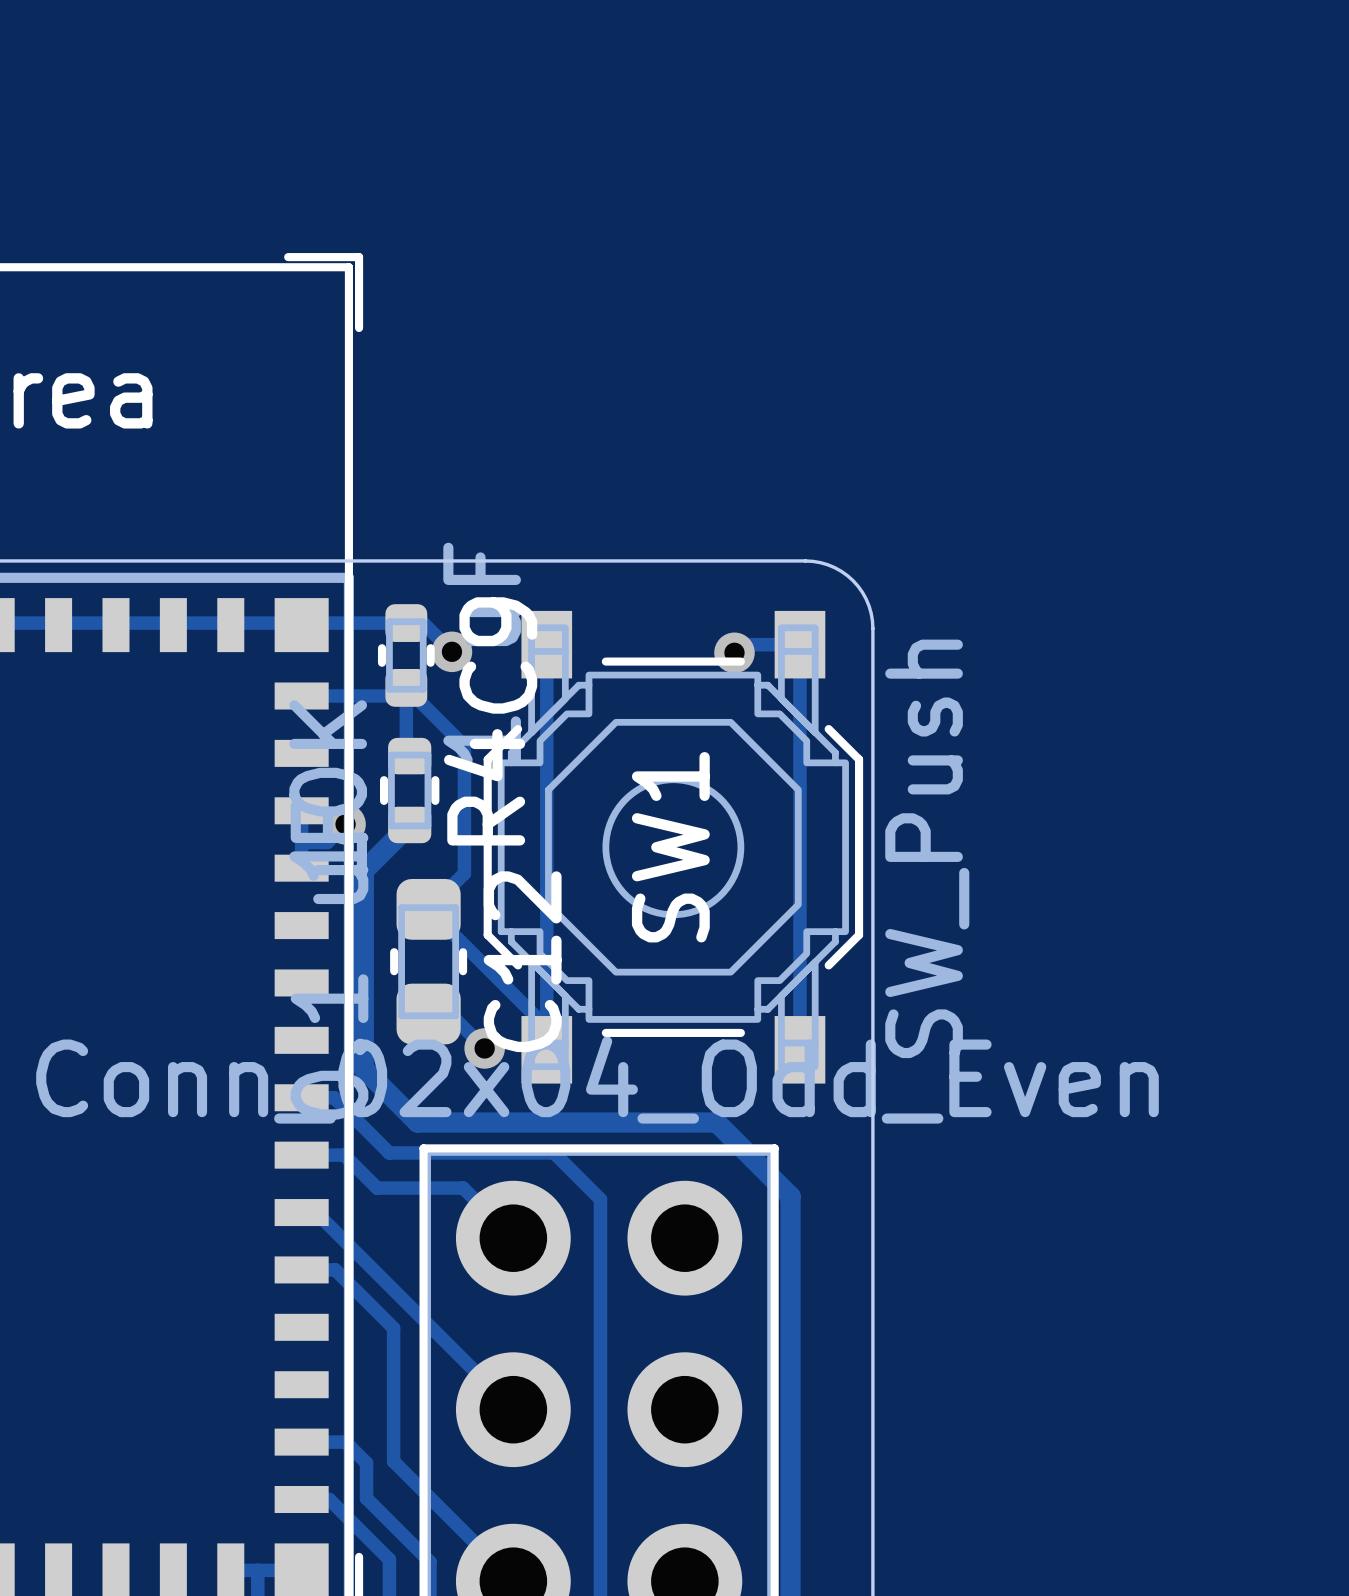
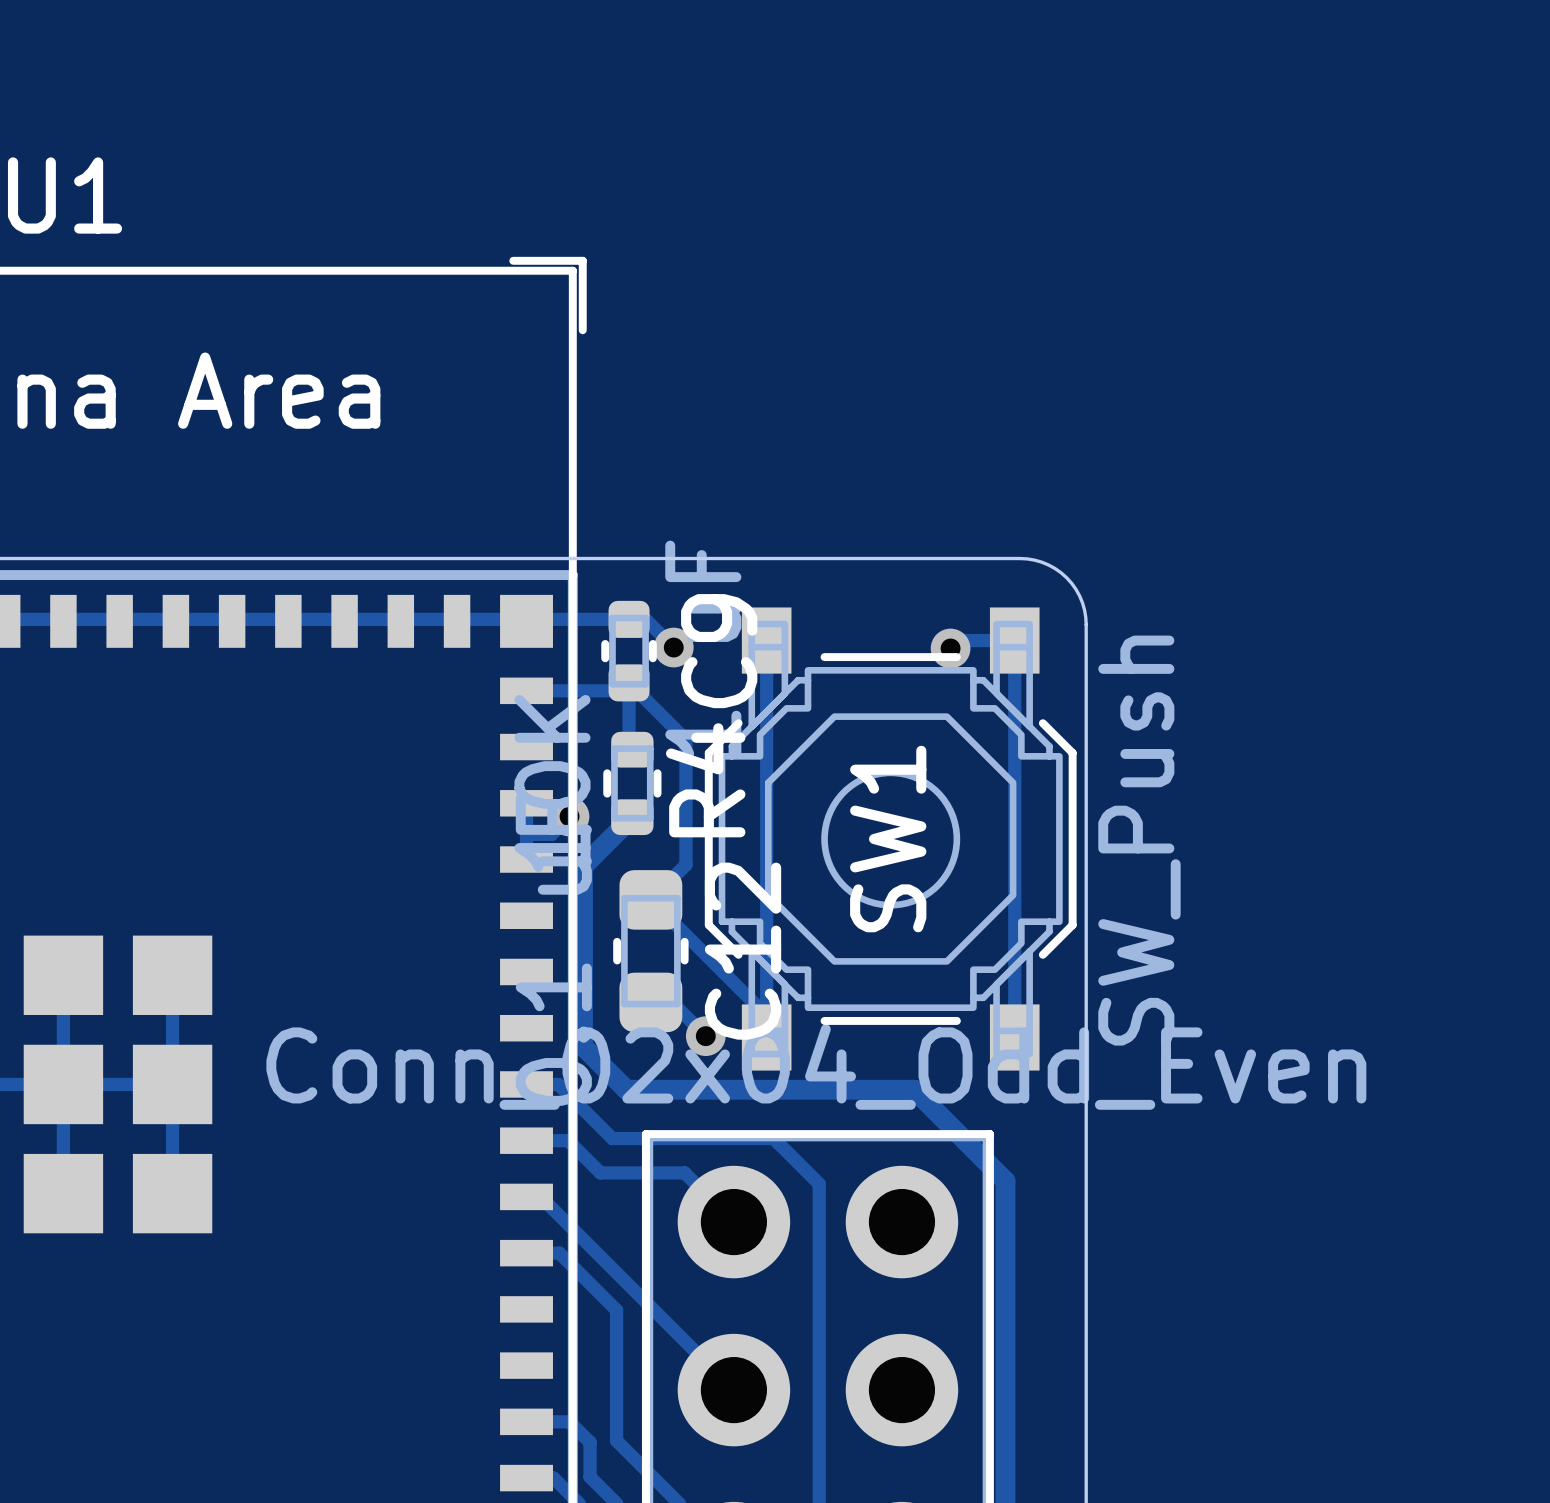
track: (363, 870) (363, 1068) (417, 1122) (716, 1122) -> (587, 862) (582, 866) (582, 1046) (626, 1089) (914, 1089) (933, 1108)

